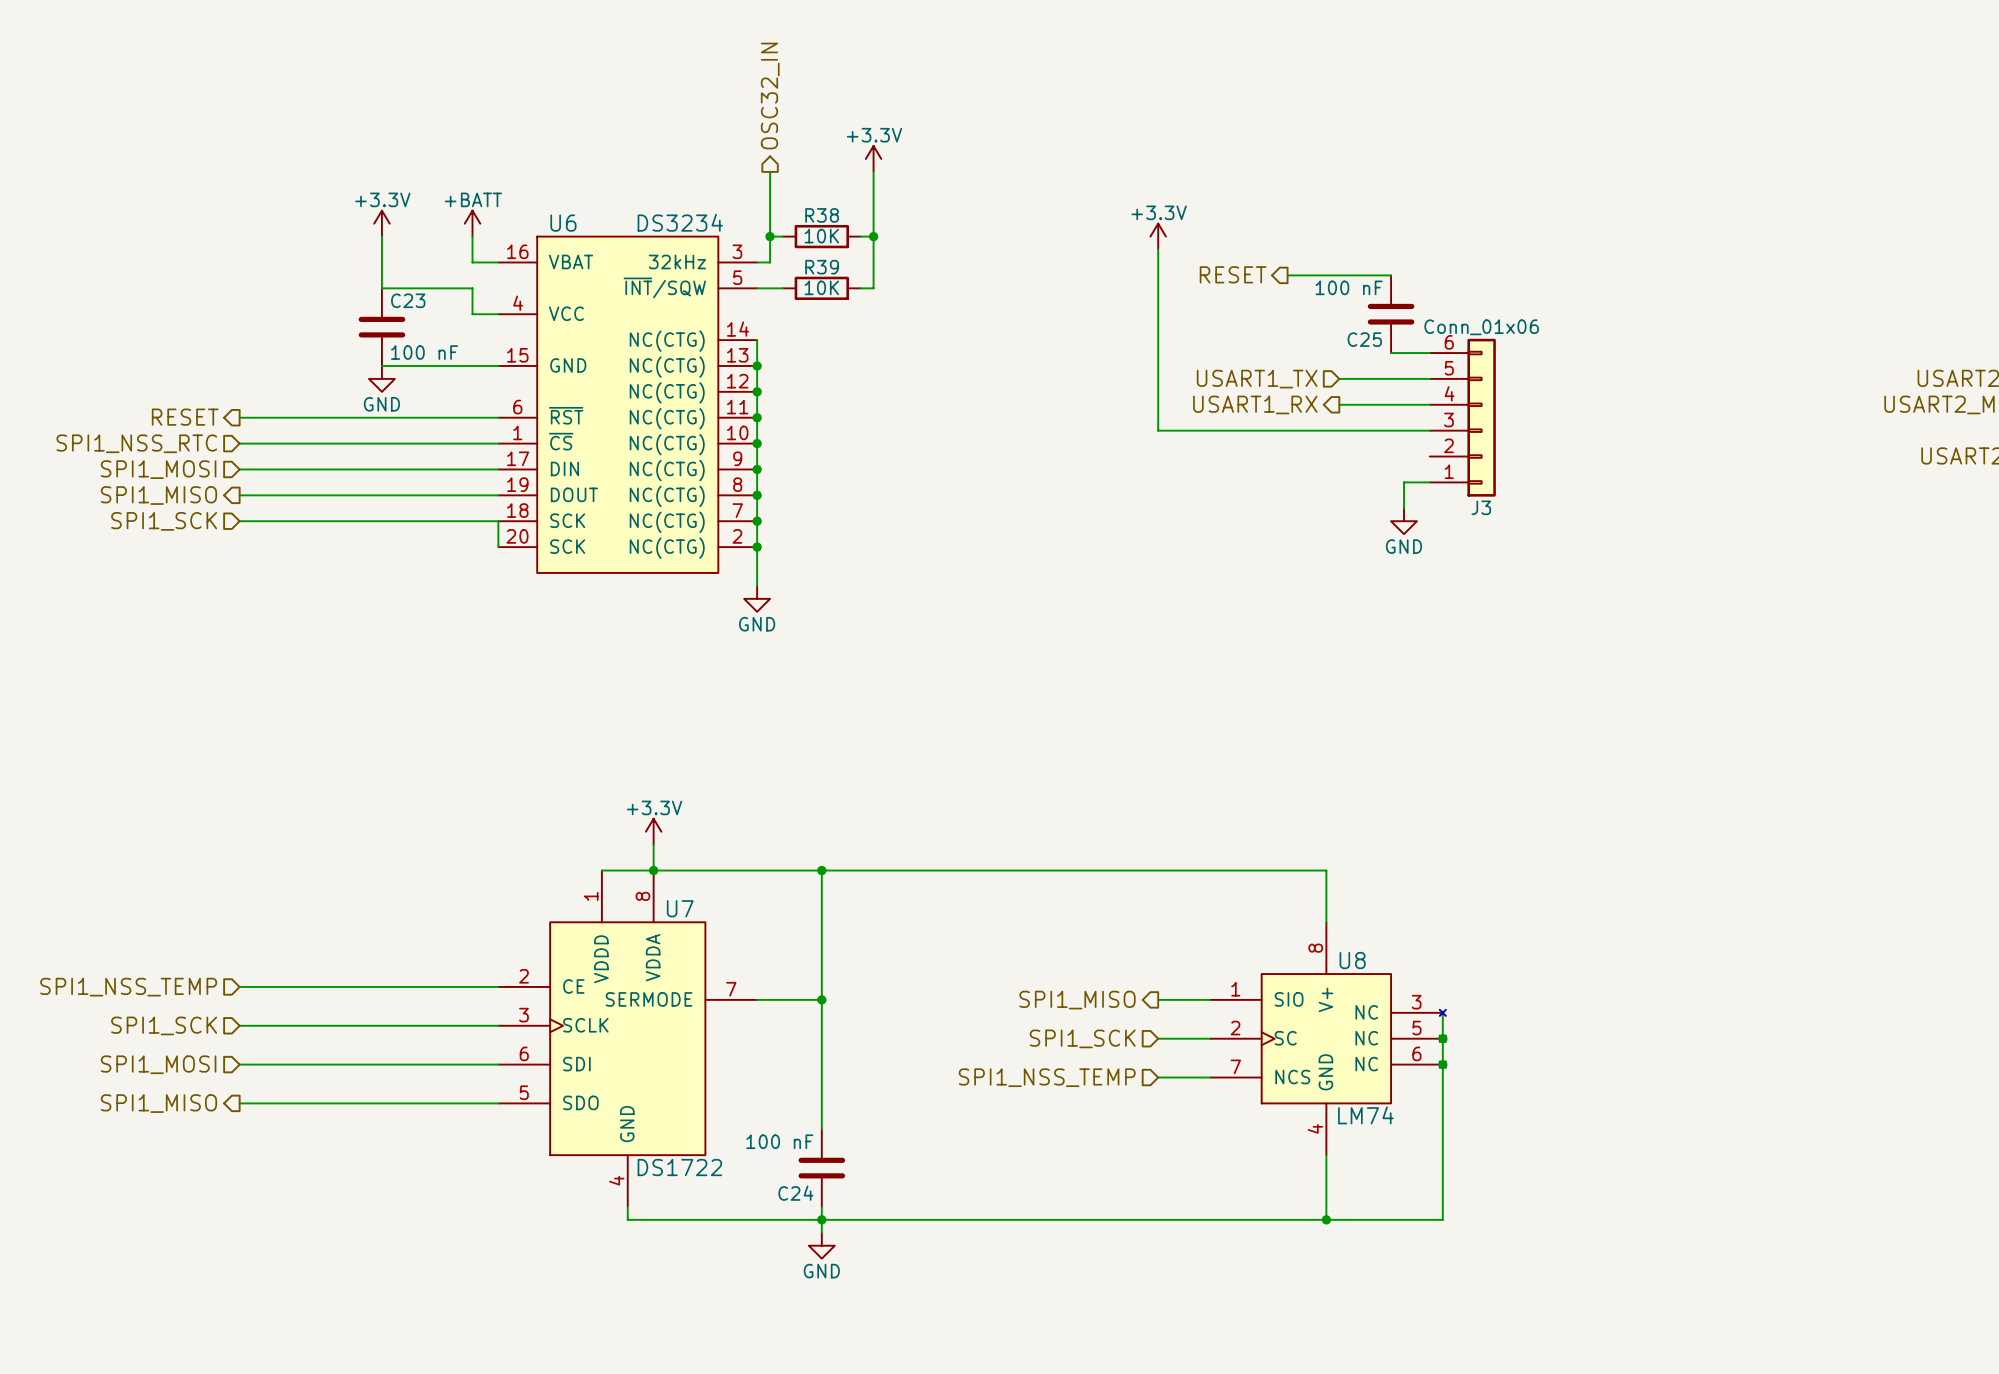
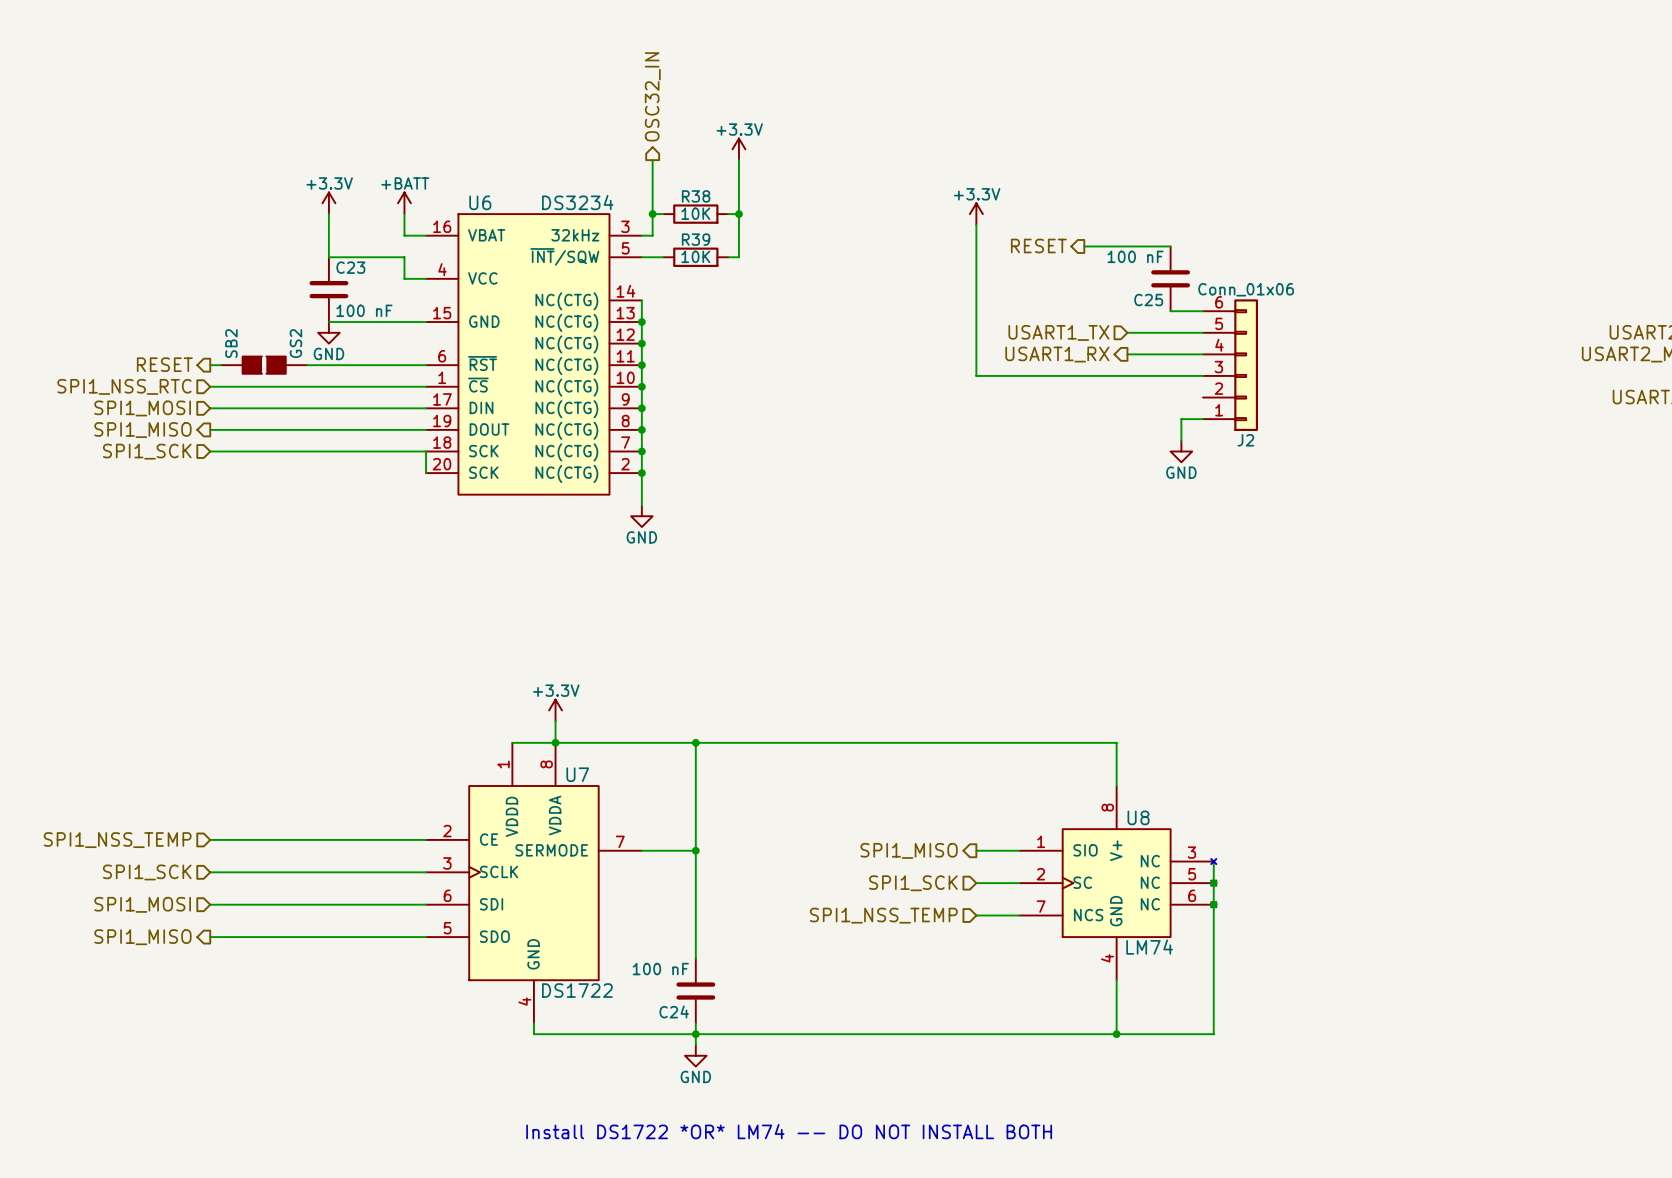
SB2: none -> GS2 (264, 365)
J3 name: J3 (1481, 507) -> J2 (1245, 440)
text: none -> Install DS1722 *OR* LM74 -- DO NOT INSTALL BOTH (789, 1131)

